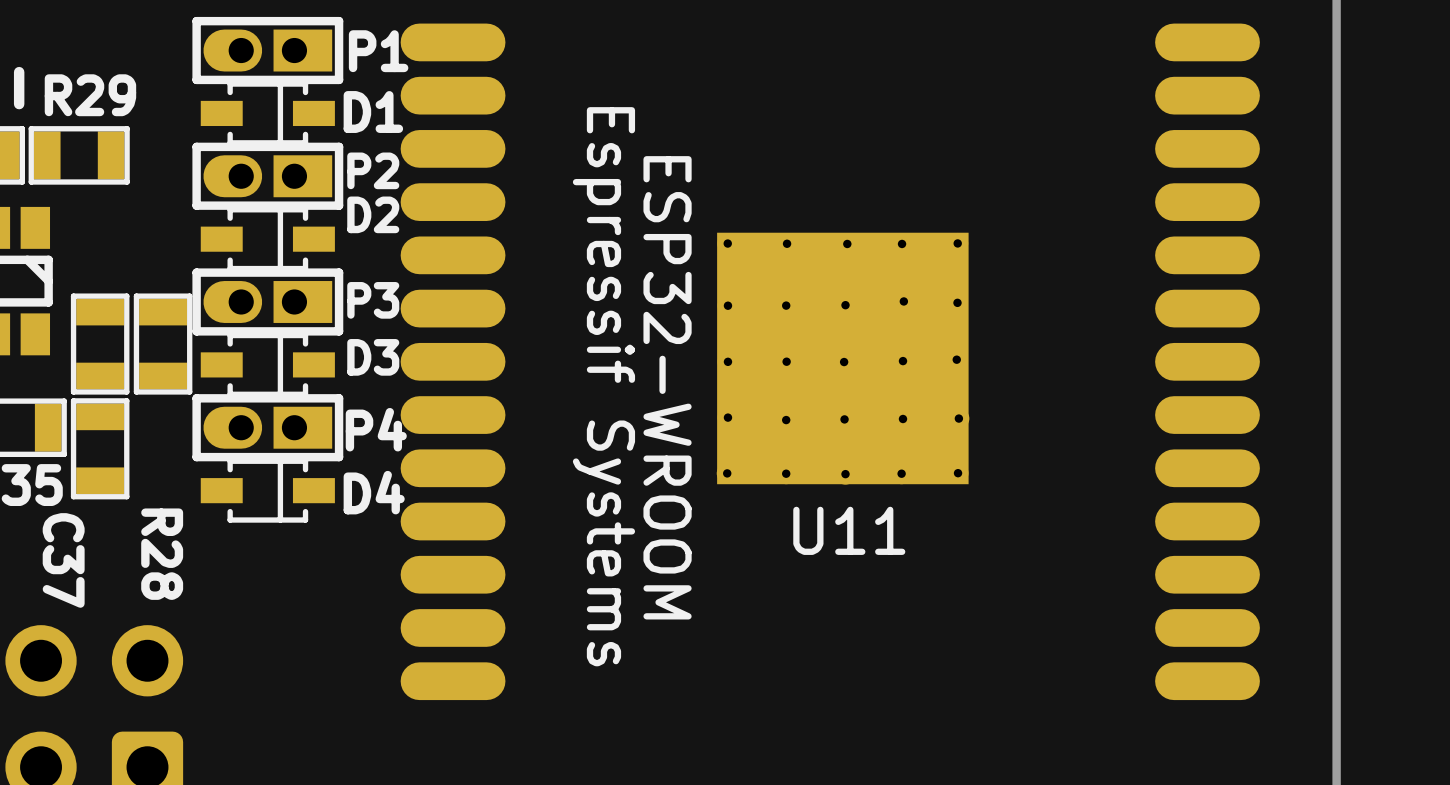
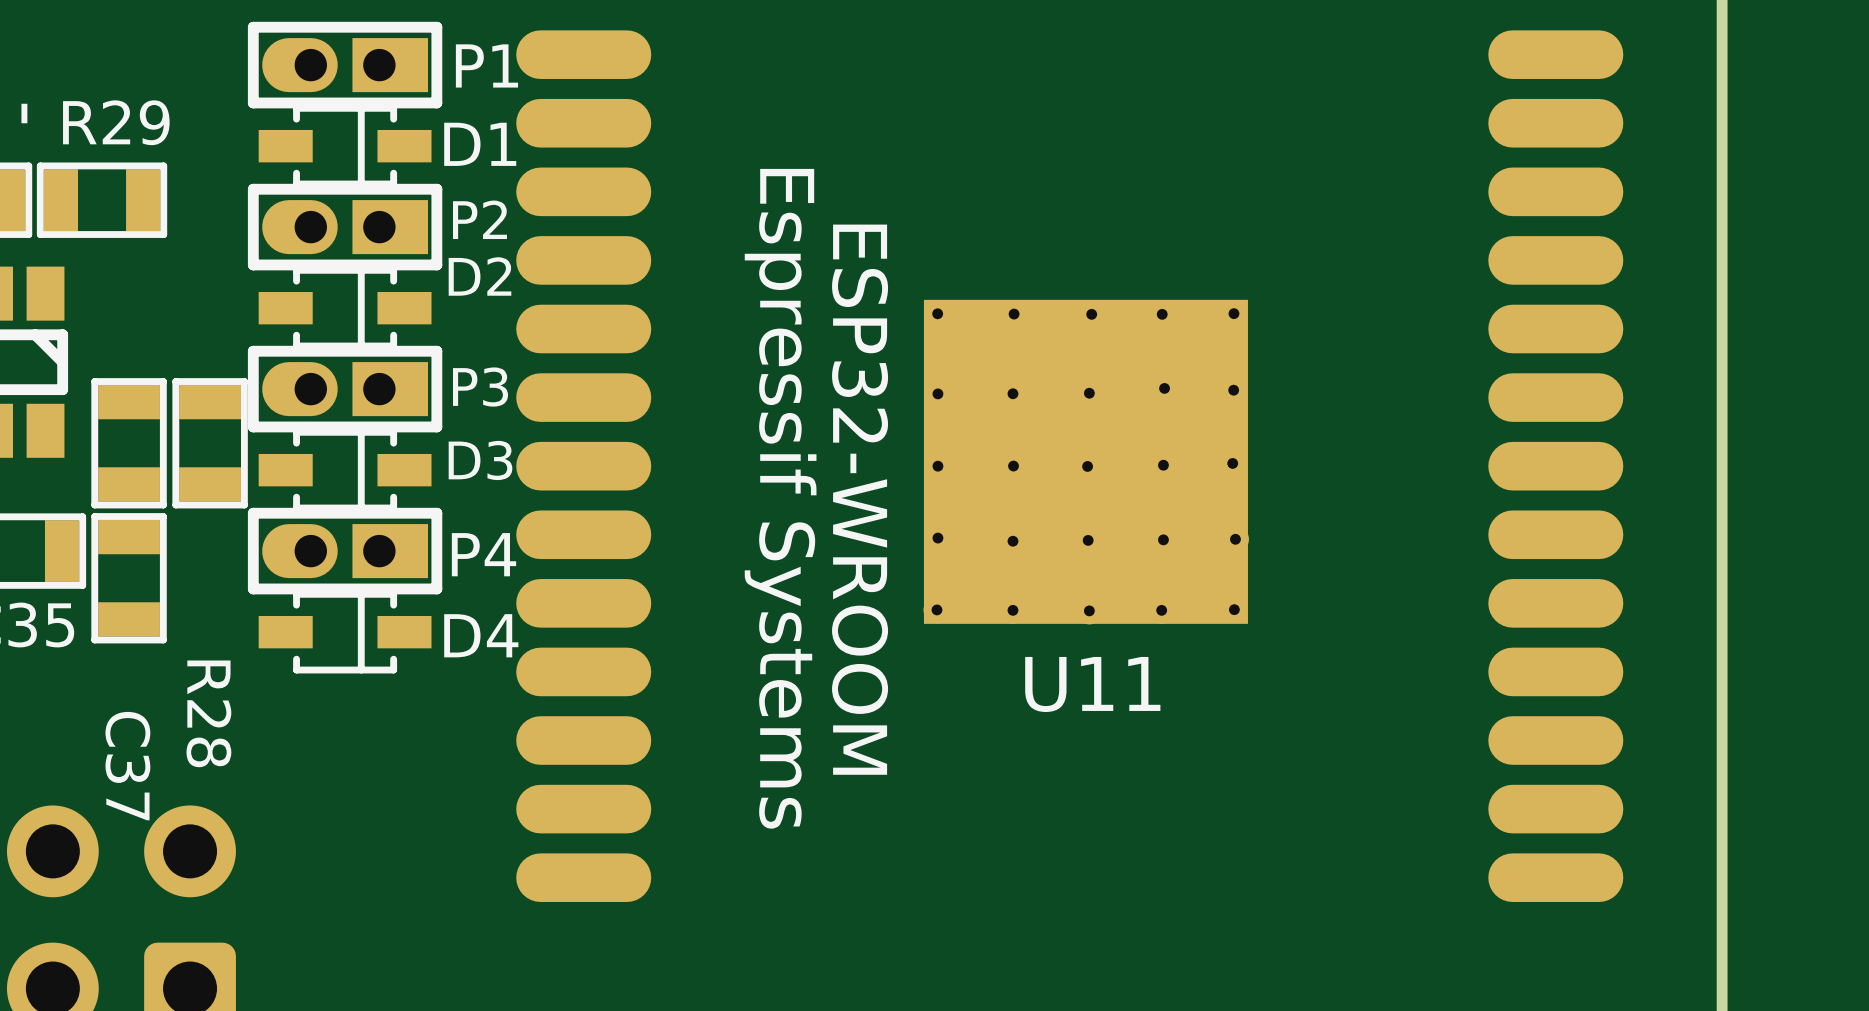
C37 name position: C37 (63, 560) -> C37 (127, 766)

